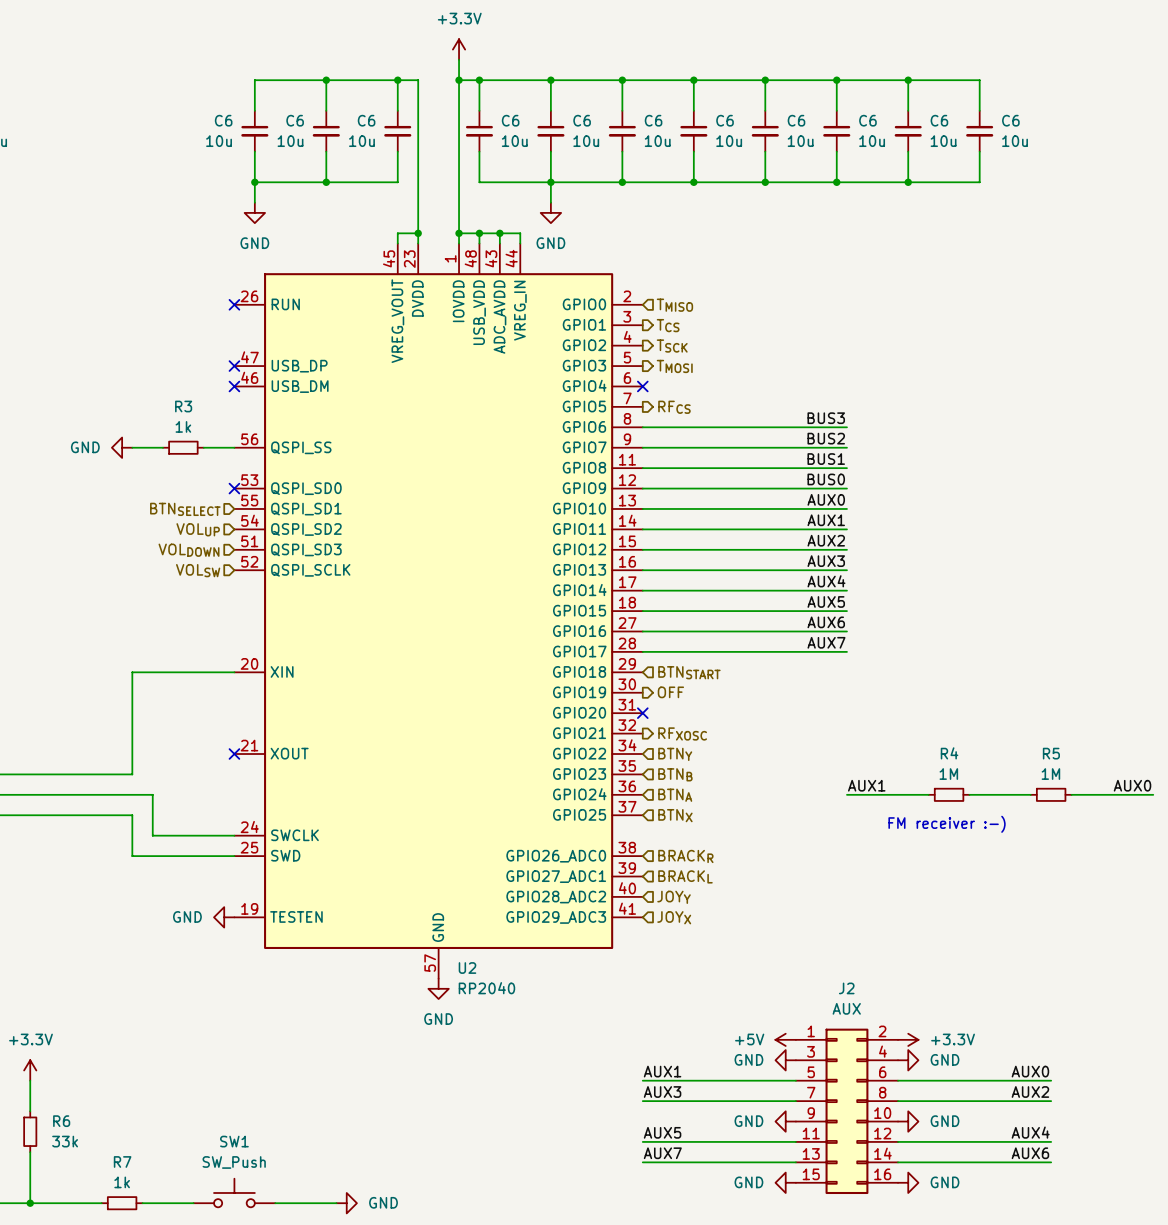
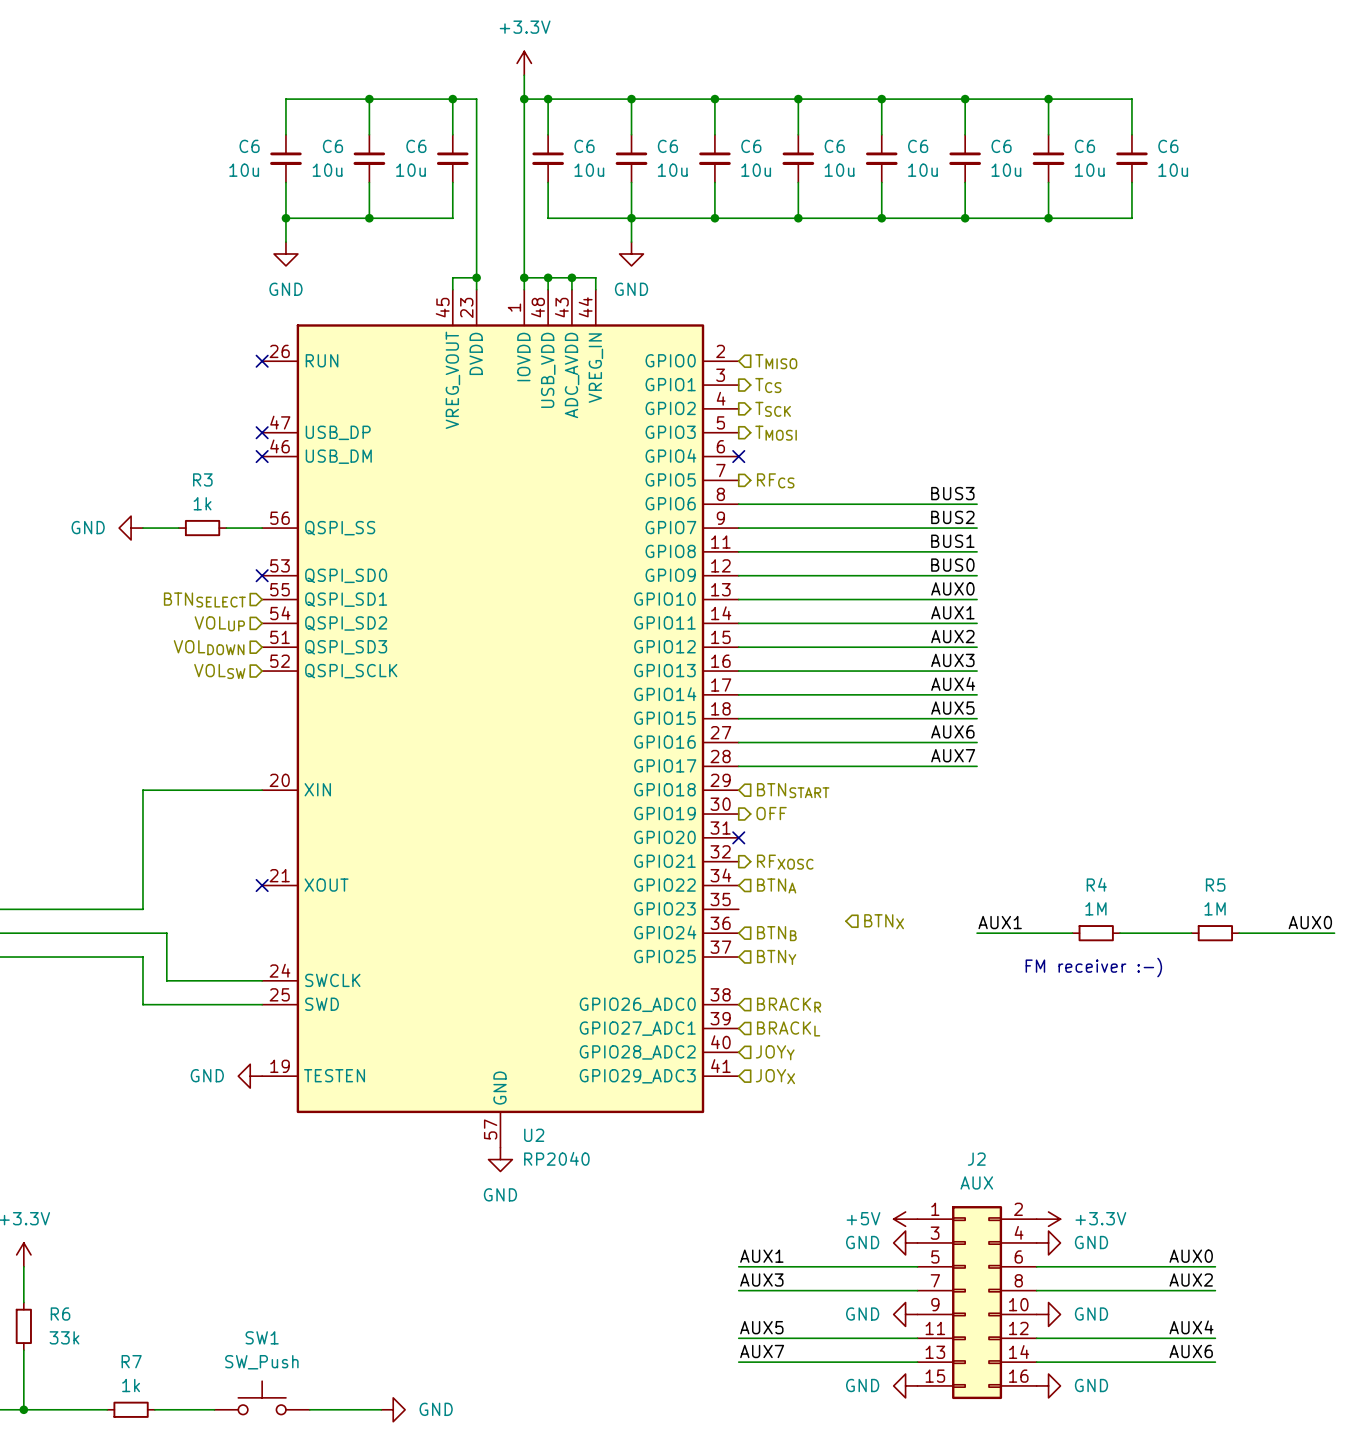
hierarchical label: BTNY (675, 754) -> BTNA (776, 885)
hierarchical label: BTNB (675, 774) -> none
hierarchical label: none -> BTNX (884, 921)
hierarchical label: BTNA (675, 795) -> BTNB (776, 933)
hierarchical label: BTNX (675, 815) -> BTNY (776, 957)

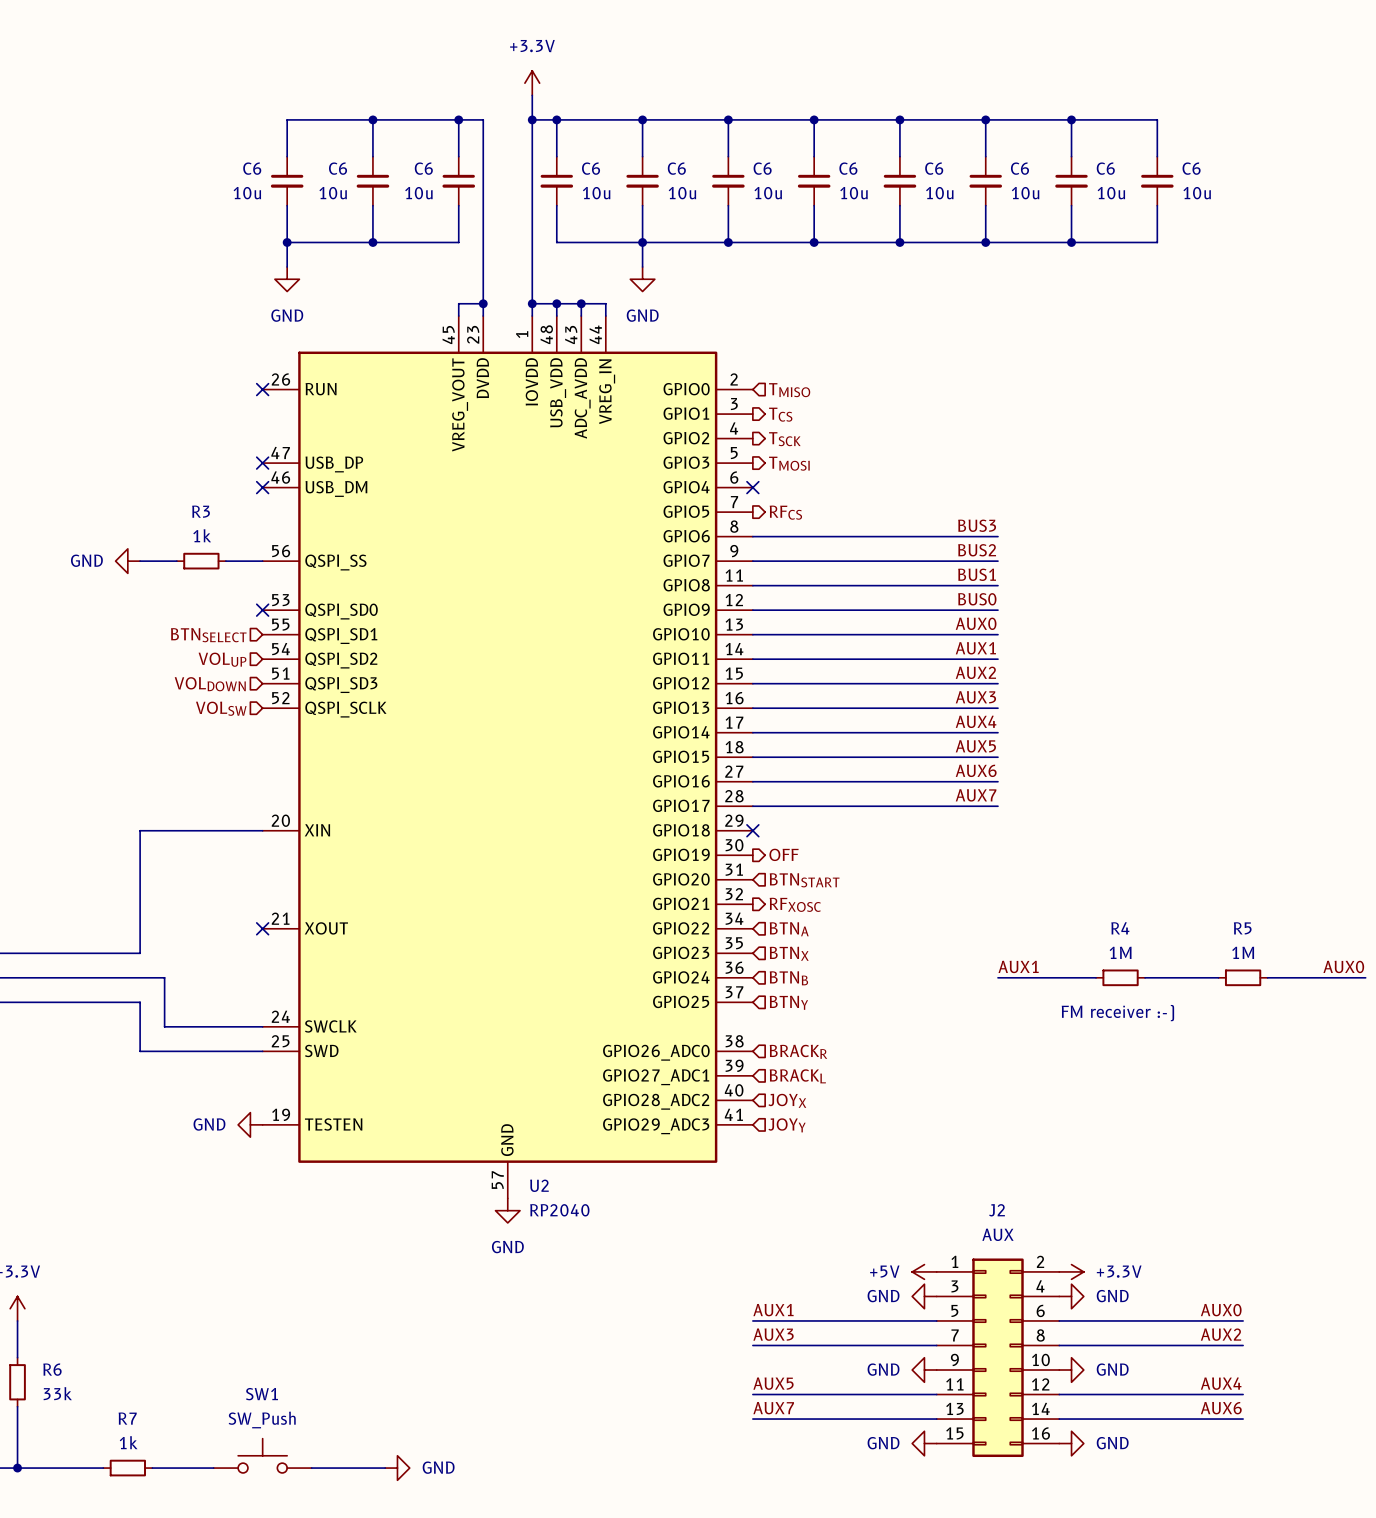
hierarchical label position: BTNSTART (793, 790) -> BTNSTART (804, 880)
no-connect mark position: (738, 837) -> (752, 830)
hierarchical label position: BTNX (884, 921) -> BTNX (789, 953)
hierarchical label: JOYY (775, 1052) -> JOYX (787, 1100)
hierarchical label: JOYX (775, 1076) -> JOYY (787, 1125)

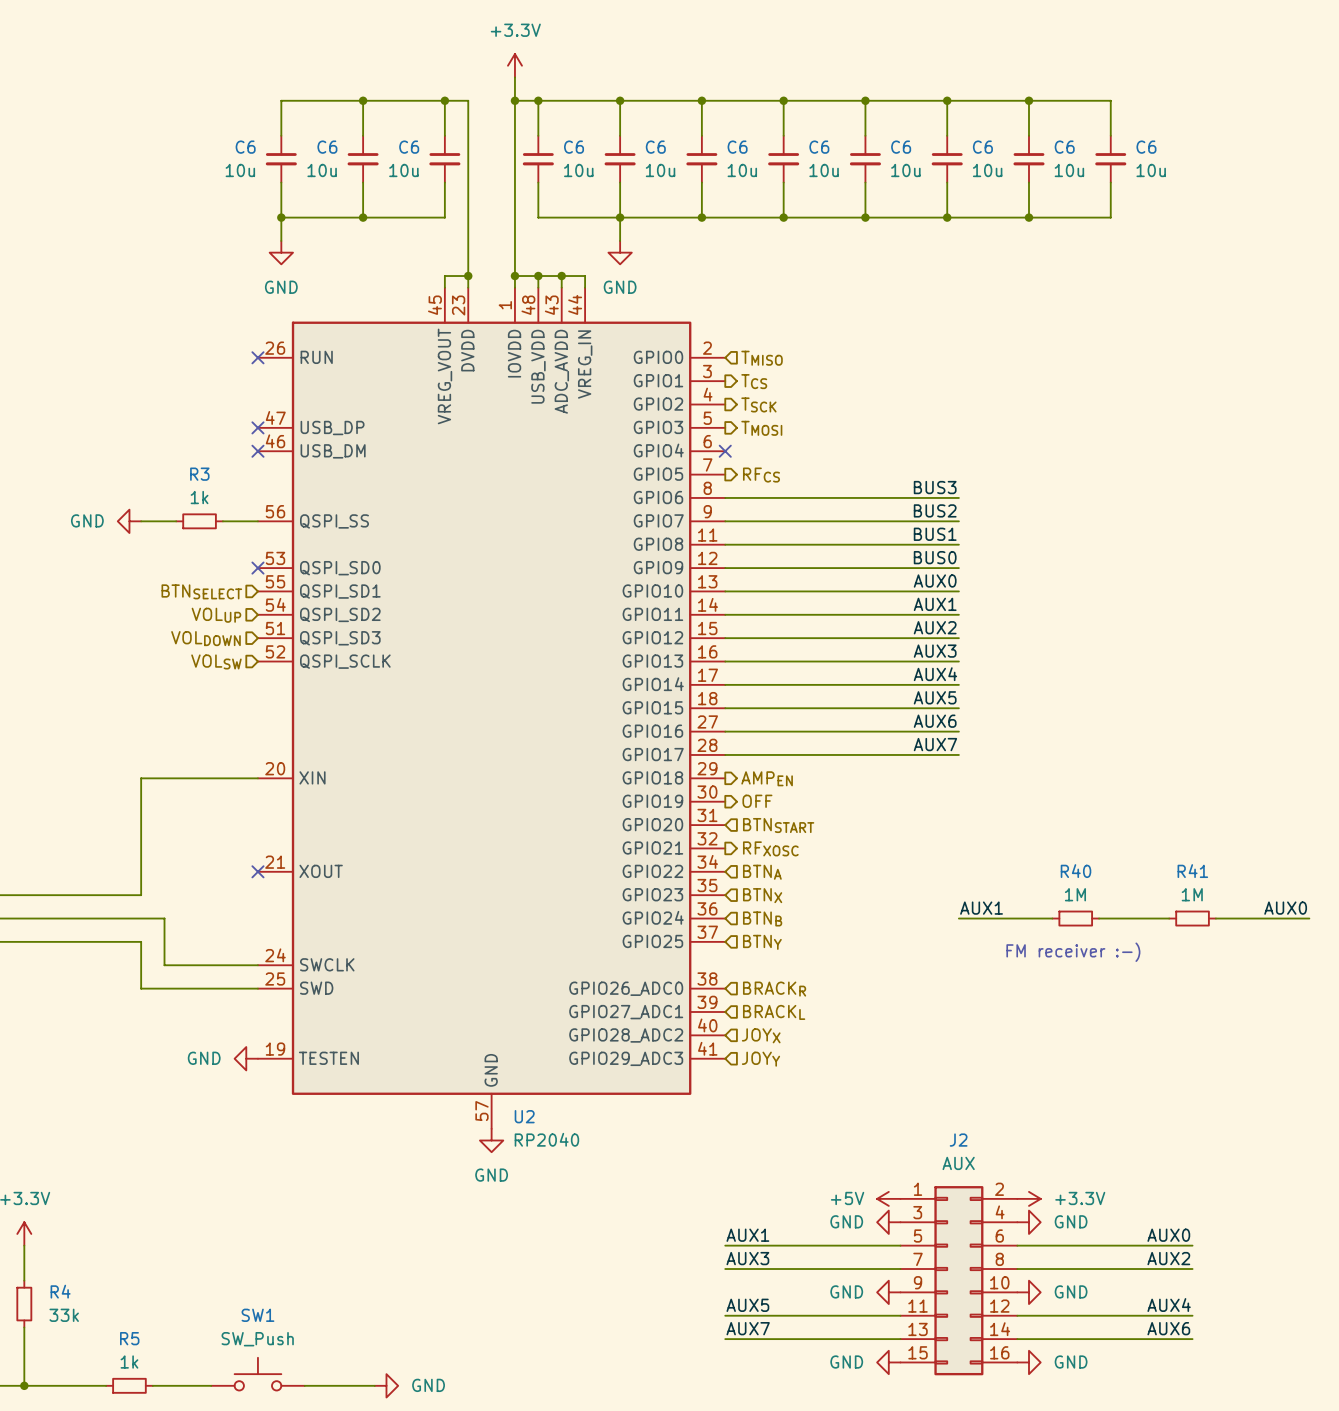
no-connect mark: (752, 830) -> none
hierarchical label: none -> AMPEN (767, 778)
R4 name: R4 (1120, 928) -> R40 (1076, 871)
R5 name: R5 (1242, 928) -> R41 (1192, 871)
R6 name: R6 (52, 1369) -> R4 (60, 1291)
R7 name: R7 (127, 1418) -> R5 (129, 1338)

